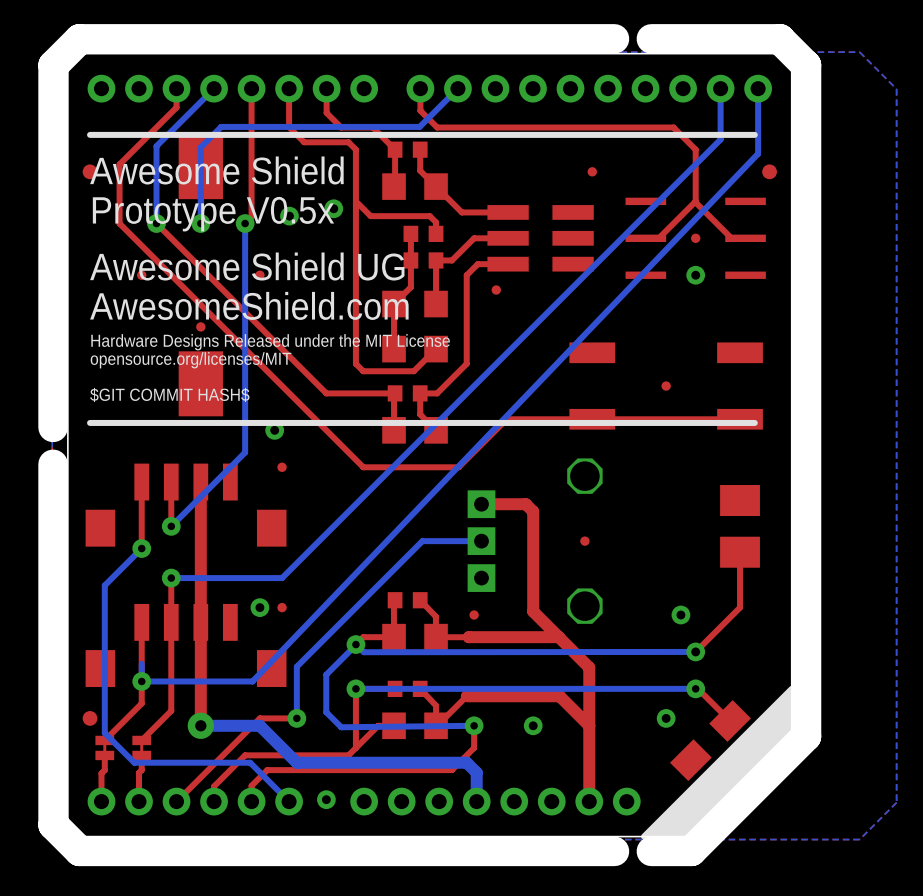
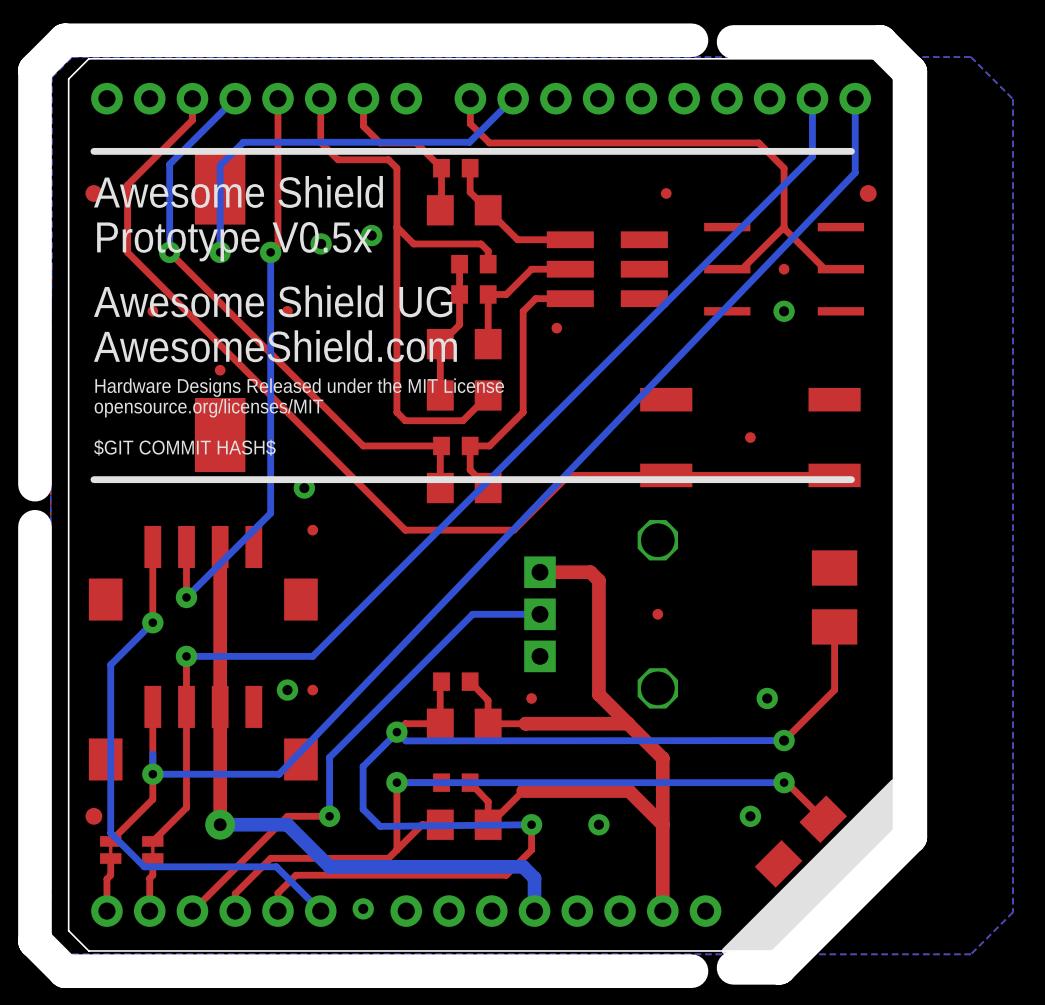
board edge: none -> (691, 40) (64, 40) (34, 70) (34, 484)
board edge: (614, 38) (79, 38) (53, 65) (53, 427) -> none
board edge: none -> (34, 526) (34, 941) (64, 971) (691, 971)
board edge: (53, 464) (53, 825) (79, 851) (614, 851) -> none

